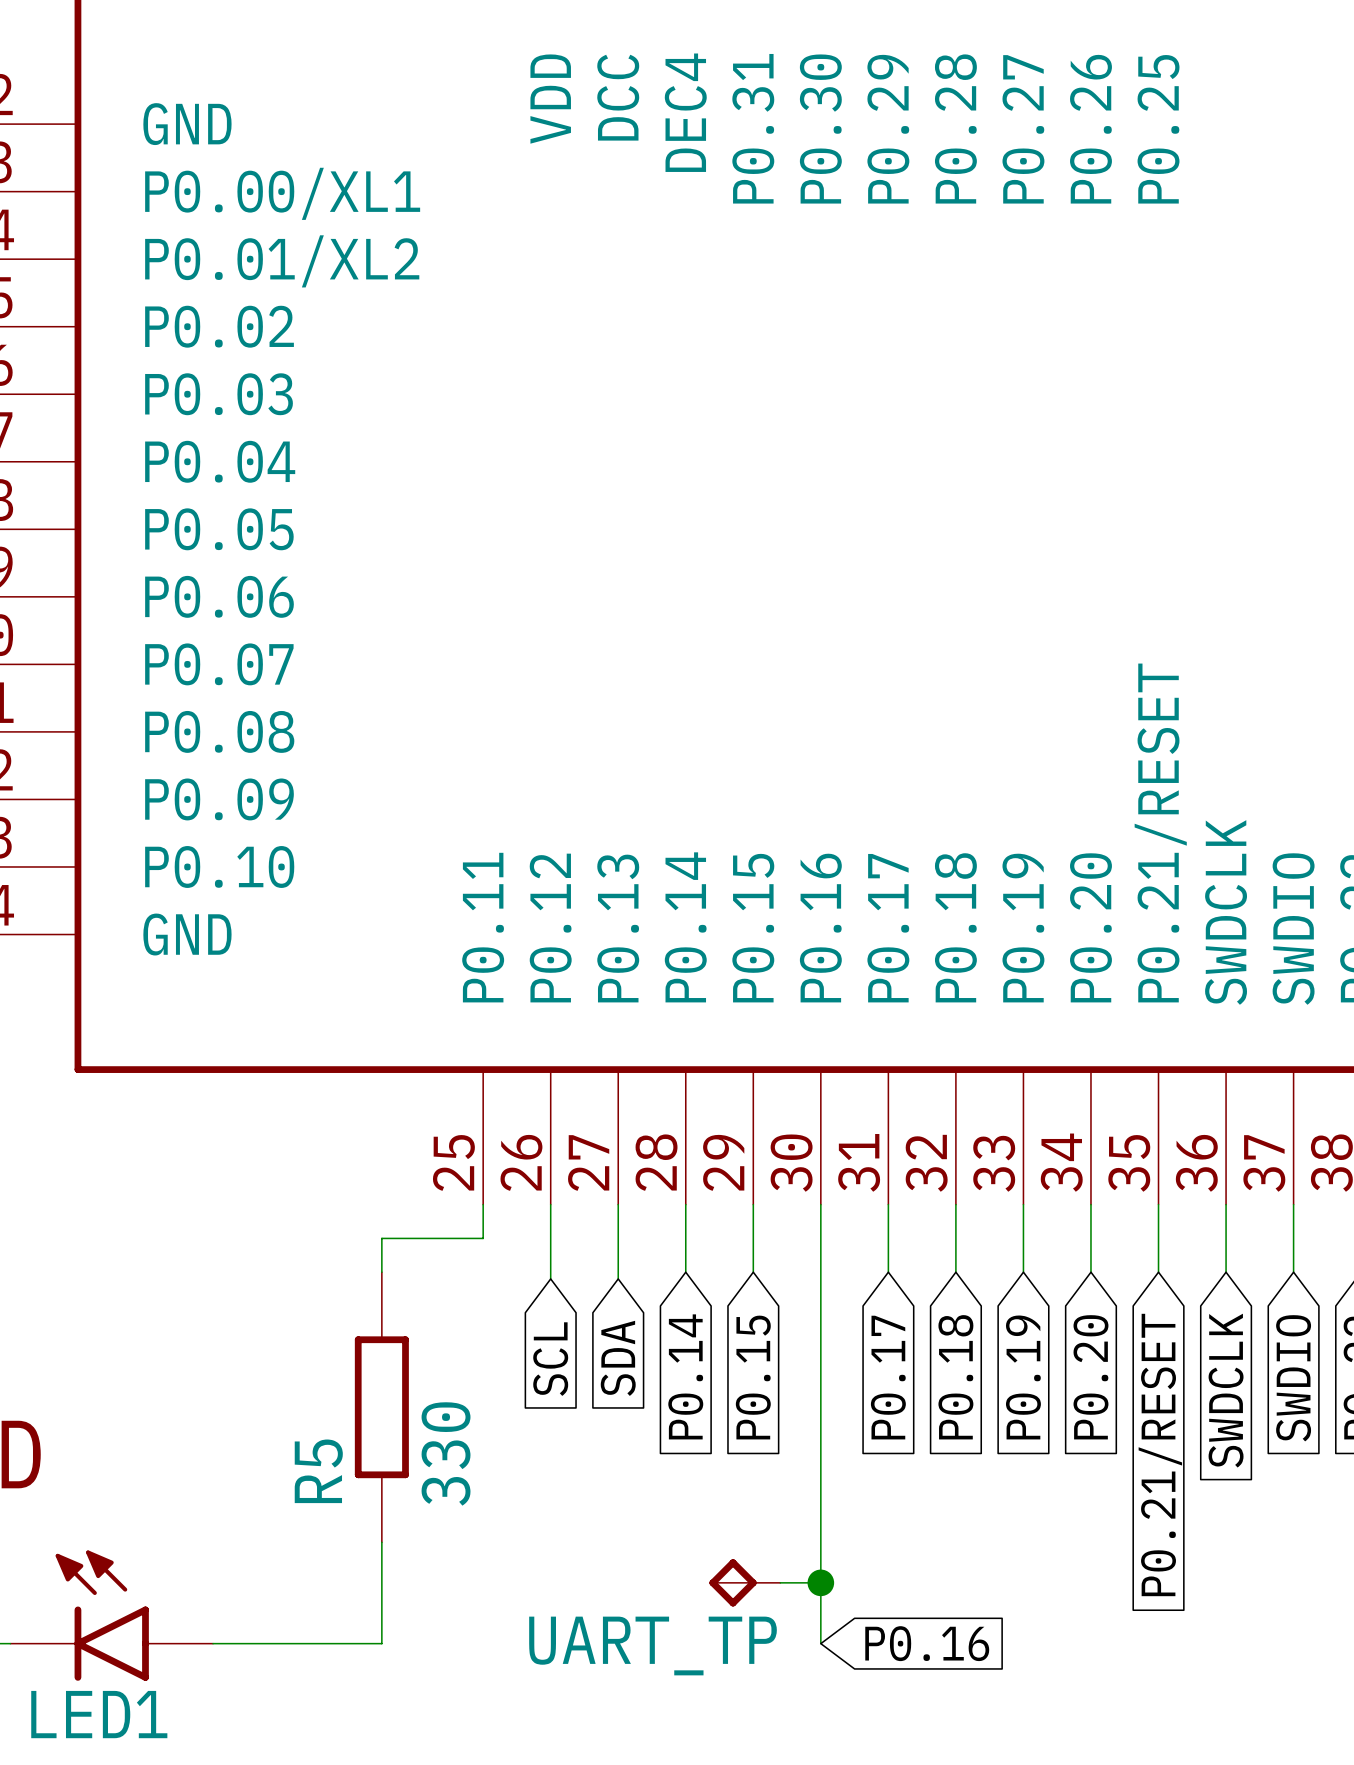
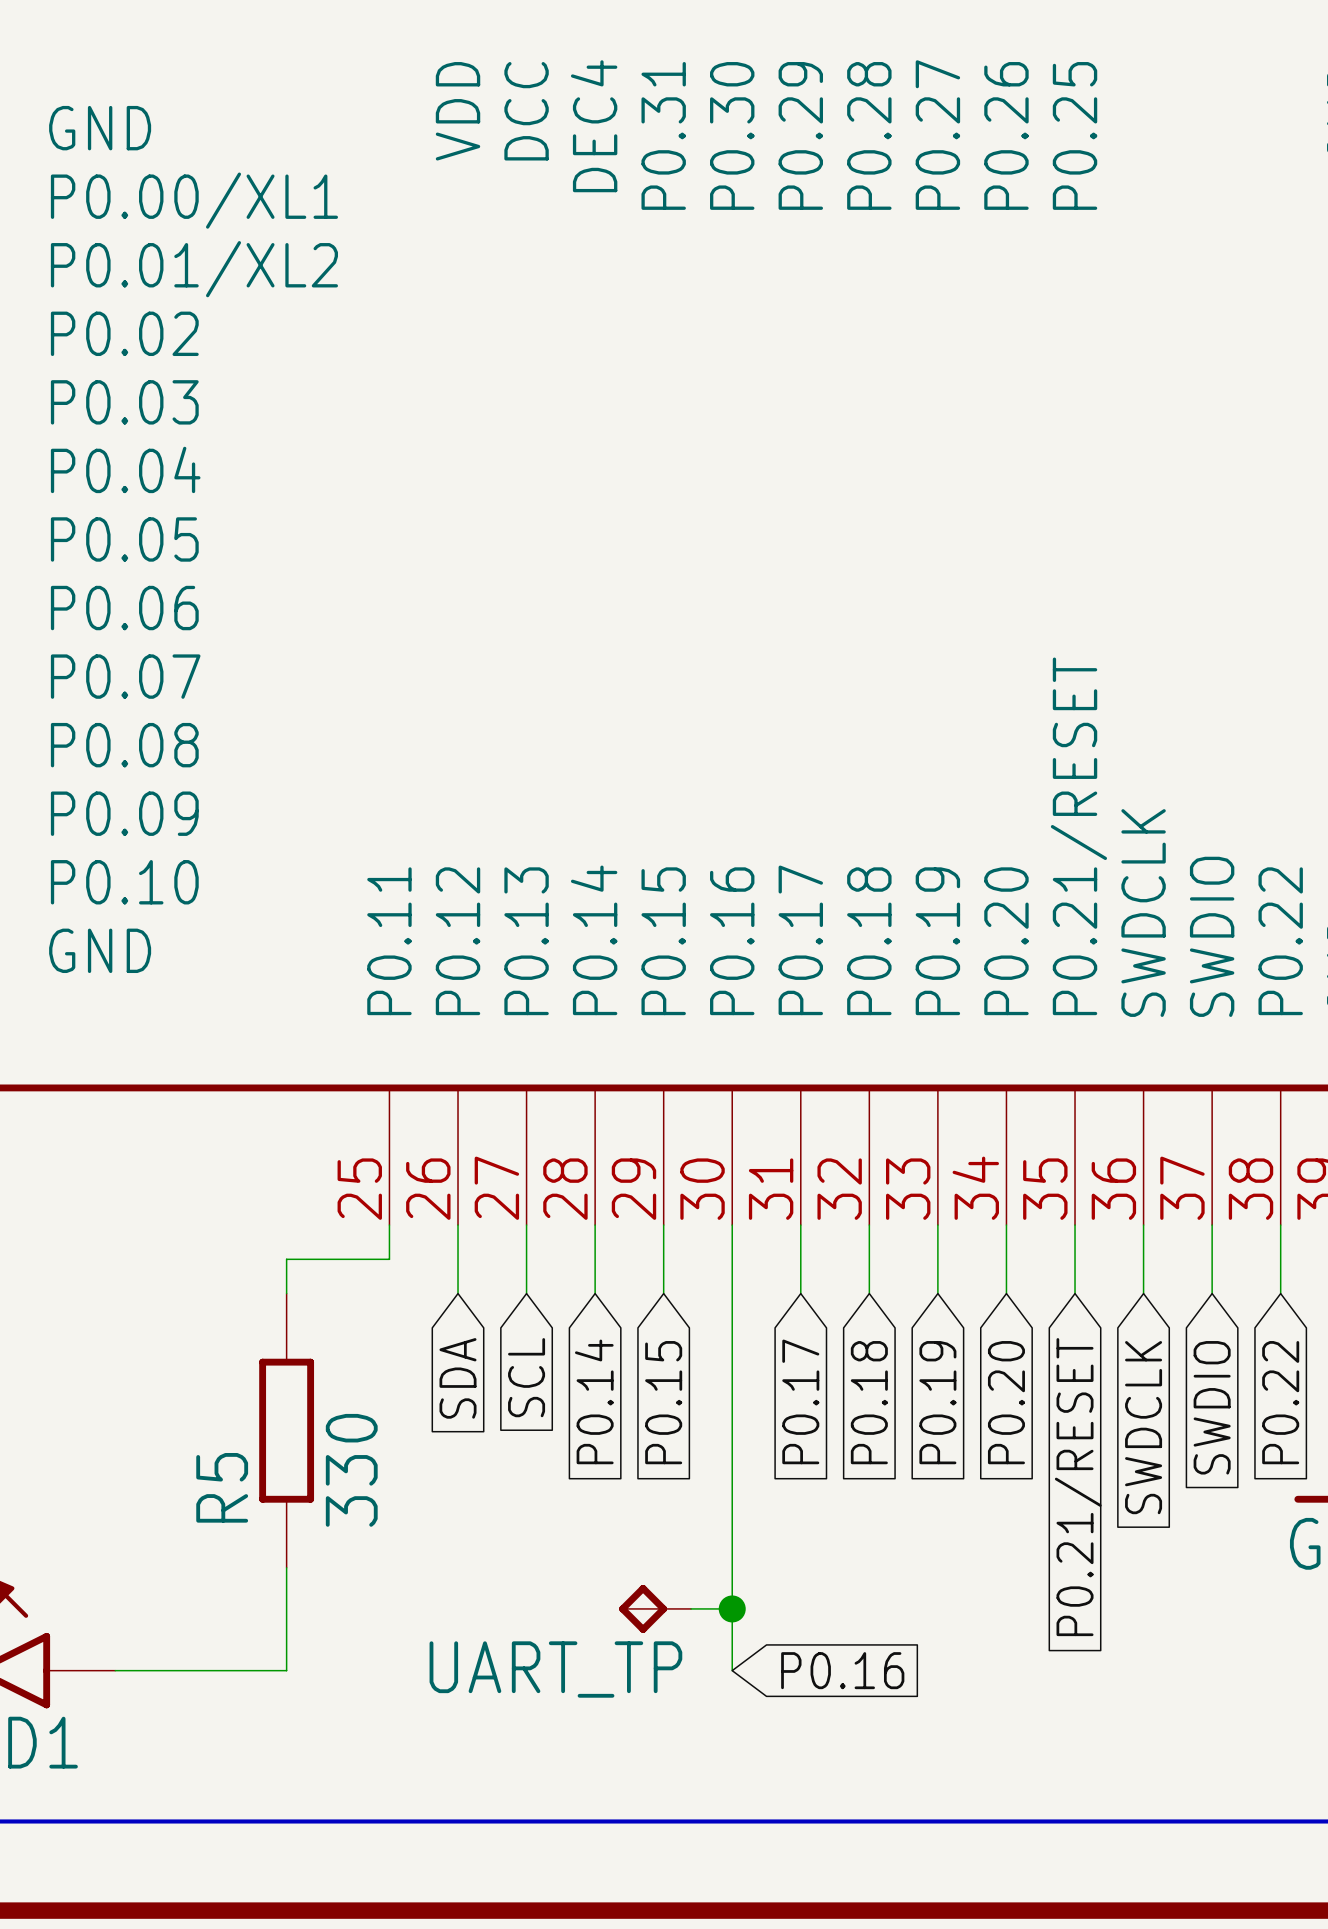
wire: (550, 1272) (550, 1278) -> none
wire: (618, 1272) (618, 1278) -> none
global label: SDA (618, 1358) -> SCL (526, 1377)
global label: SCL (550, 1359) -> SDA (458, 1378)

